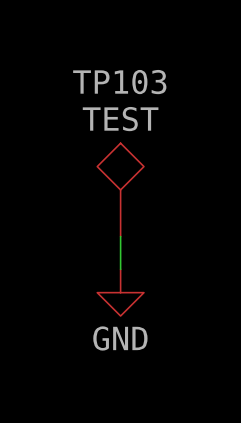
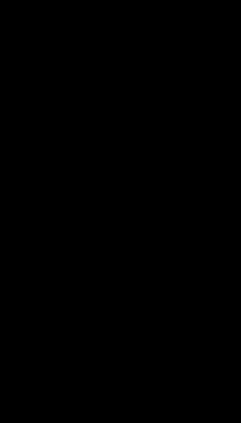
TP103: TEST (120, 189) -> none
wire: (120, 236) (120, 269) -> none
power symbol: GND (120, 292) -> none

